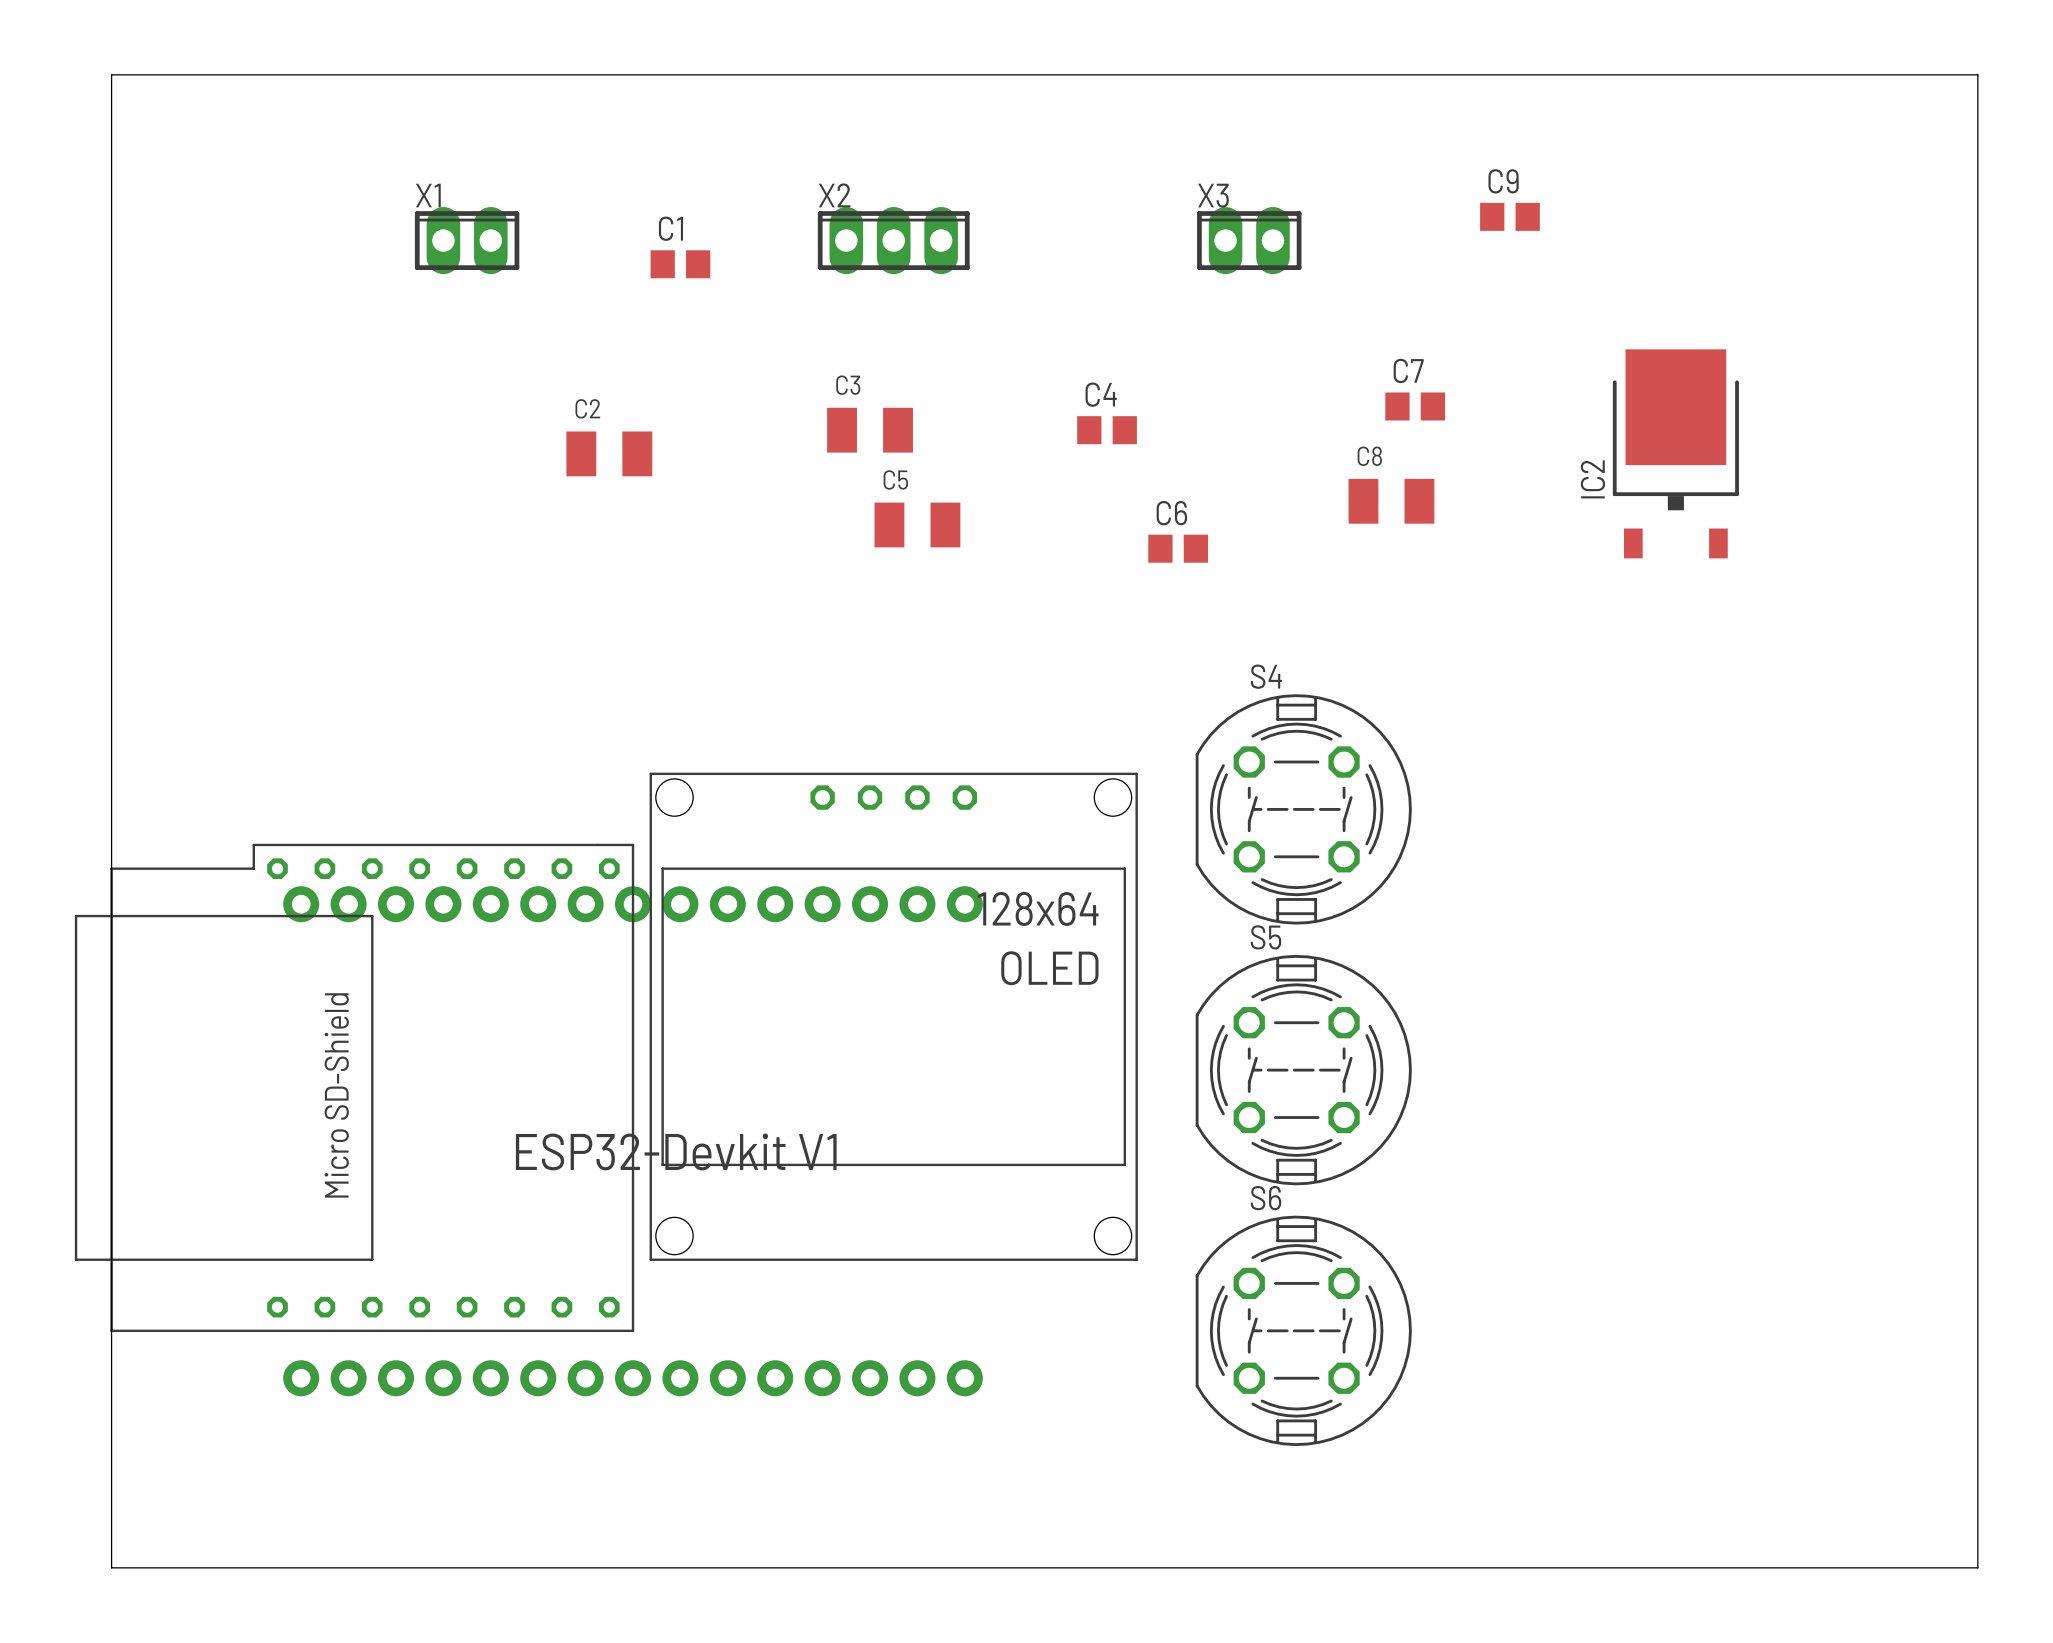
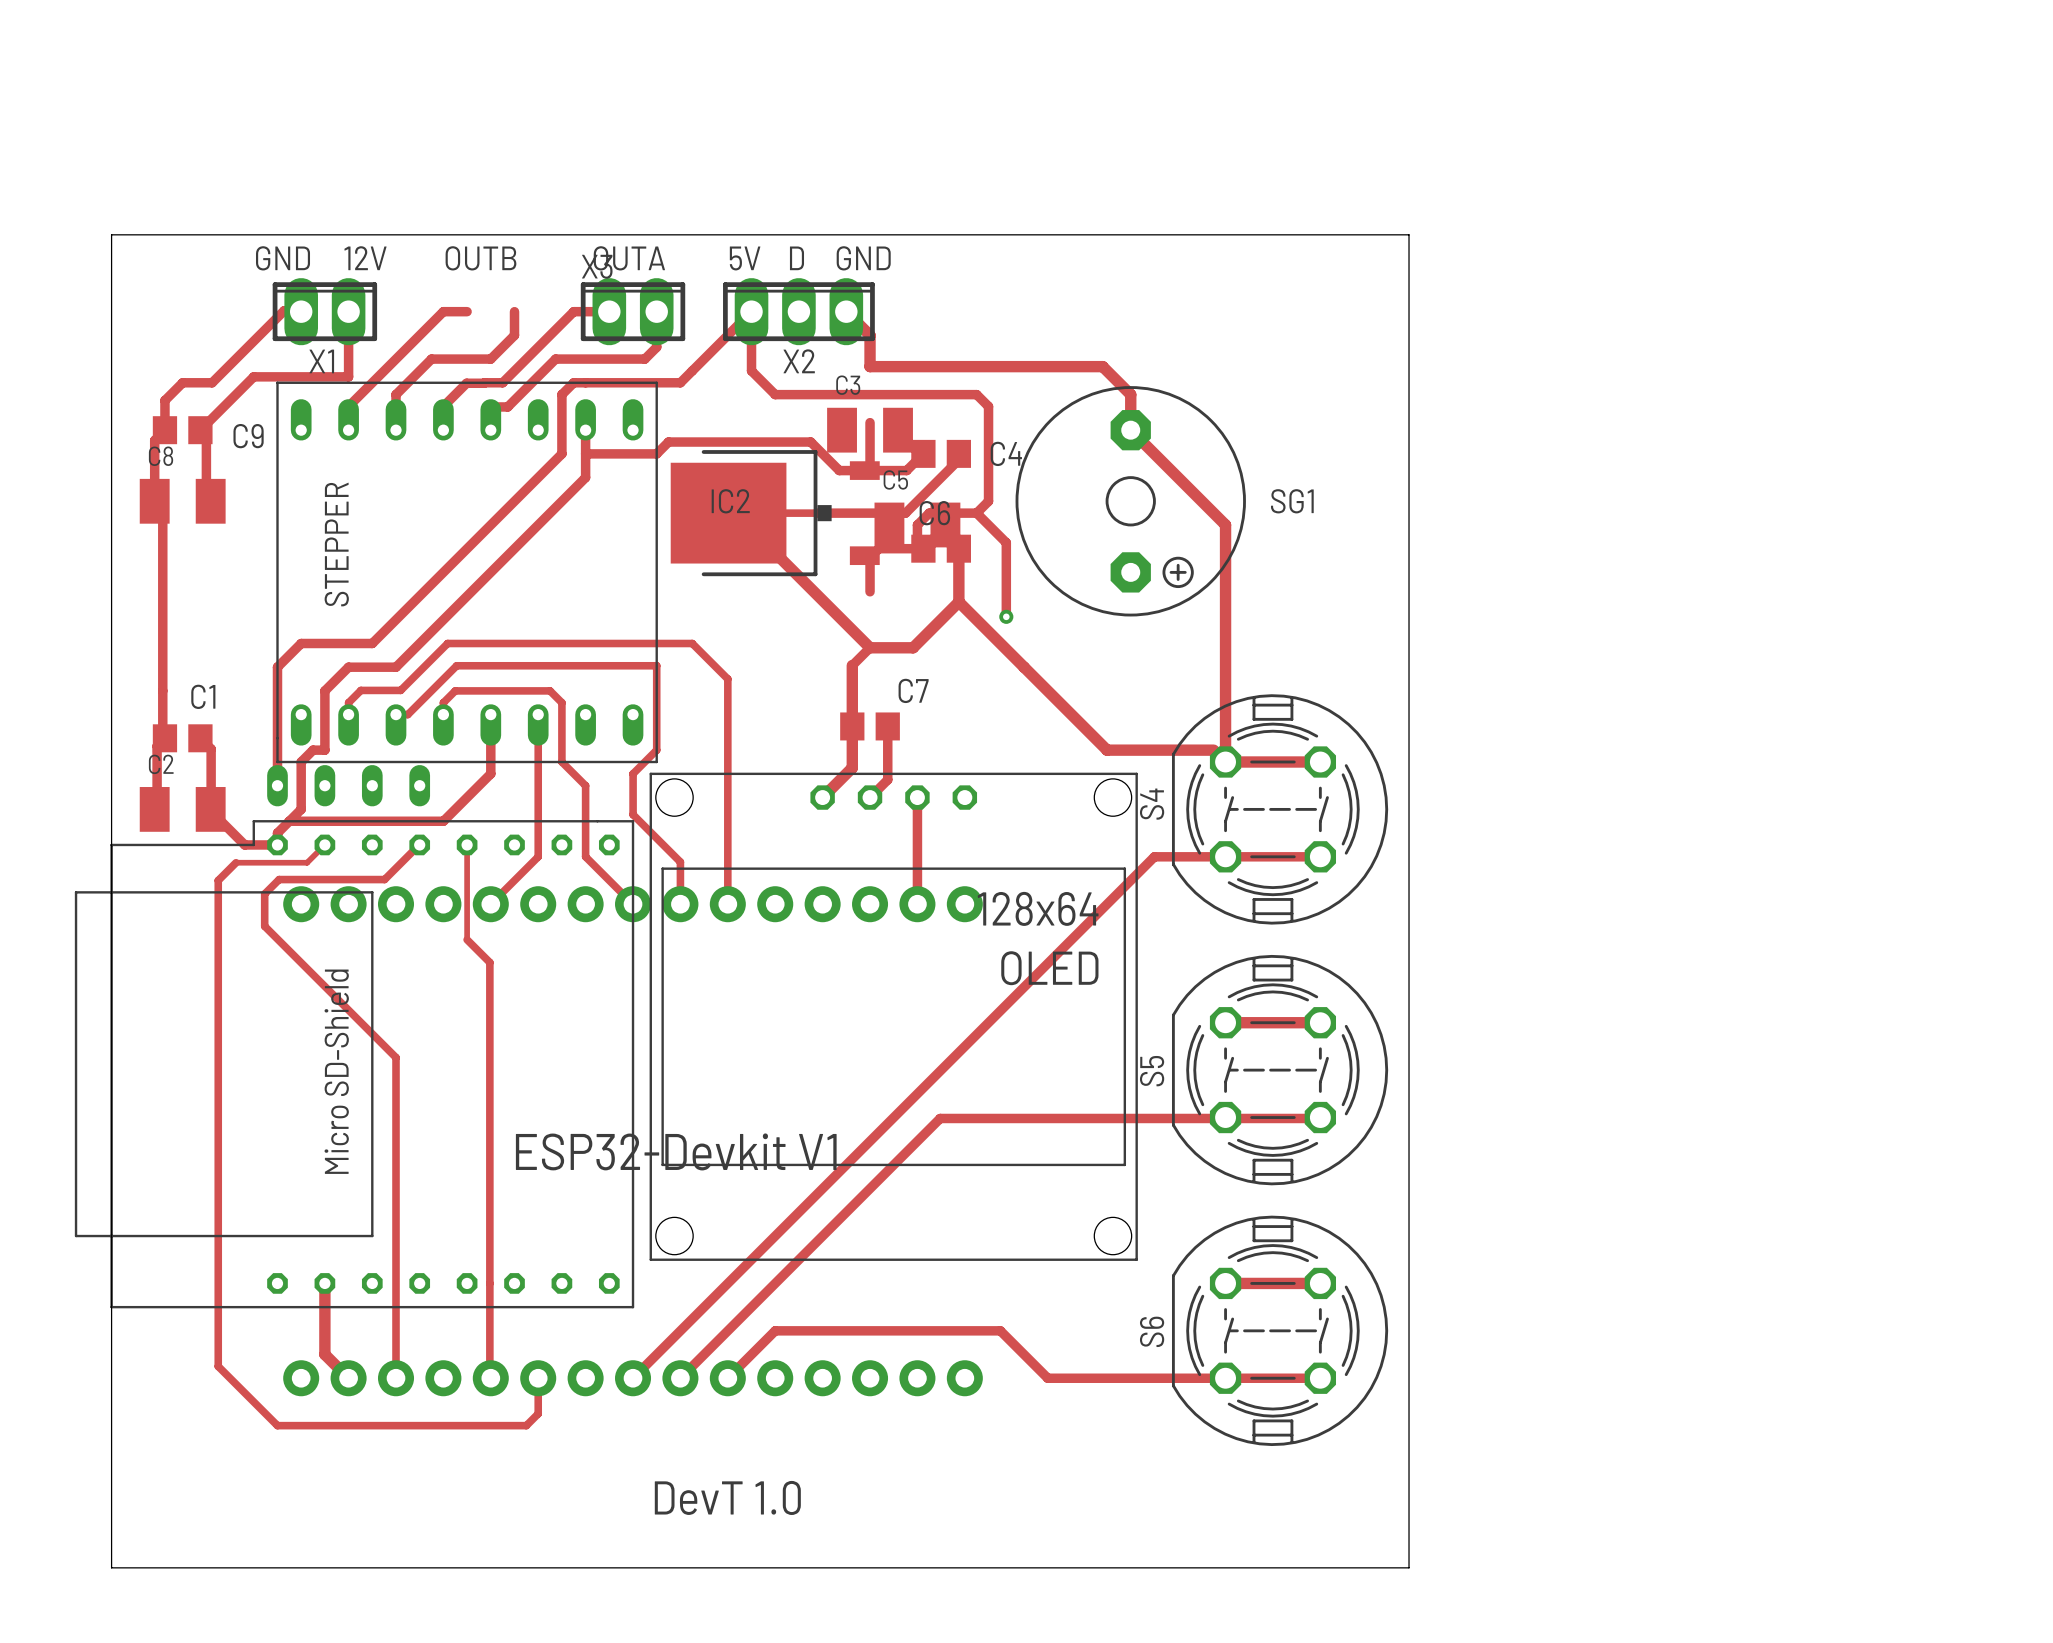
C9 name position: C9 (1503, 181) -> C9 (248, 436)
X1 name position: X1 (428, 195) -> X1 (321, 361)
X2 name position: X2 (834, 195) -> X2 (799, 361)
C9 position: (1509, 216) -> (182, 430)
C1 name position: C1 (670, 228) -> C1 (203, 696)
board edge: (111, 234) (111, 74) (1977, 74) (1977, 1567) (1409, 1567) -> (111, 234) (1409, 234) (1409, 1567)
X1 position: (467, 240) -> (324, 311)
X2 position: (893, 240) -> (798, 311)
X3 position: (1249, 240) -> (633, 311)
text: none -> GND (283, 258)
text: none -> 12V (365, 258)
text: none -> OUTB (480, 258)
text: none -> OUTA (629, 258)
text: none -> 5V (745, 258)
text: none -> D (796, 258)
text: none -> GND (863, 258)
C1 position: (680, 264) -> (182, 738)
track: none -> (301, 311) (284, 310) (212, 382) (182, 382) (164, 400) (164, 430) (154, 440) (154, 501)
track: none -> (348, 311) (348, 376) (253, 376) (200, 430)
track: none -> (467, 311) (443, 311) (348, 406) (348, 430)
track: none -> (514, 311) (514, 335) (490, 359) (431, 359) (396, 394) (396, 430)
track: none -> (609, 311) (573, 311) (502, 382) (466, 383) (443, 406) (443, 430)
track: none -> (656, 311) (656, 347) (644, 359) (555, 359) (507, 406) (490, 406) (490, 430)
track: none -> (751, 311) (680, 382) (573, 382) (561, 394) (561, 453) (372, 643) (301, 643) (277, 667) (277, 785)
track: none -> (751, 311) (751, 370) (775, 394) (976, 394) (988, 406) (988, 501) (976, 513)
track: none -> (846, 311) (870, 335) (870, 366) (1102, 366) (1130, 394) (1130, 430) (1225, 524) (1225, 762)
C7 name position: C7 (1408, 370) -> C7 (913, 690)
C4 name position: C4 (1101, 394) -> C4 (1006, 453)
C7 position: (1415, 406) -> (870, 726)
track: none -> (870, 422) (870, 465) (864, 470)
track: none -> (200, 430) (206, 436) (206, 501) (209, 501)
track: none -> (585, 430) (585, 477) (396, 667) (348, 667) (324, 690) (324, 750) (313, 750) (301, 762) (301, 809) (277, 833) (277, 844) (244, 844) (207, 807) (211, 811) (211, 749) (200, 738)
C4 position: (1107, 430) -> (941, 453)
track: none -> (585, 453) (656, 453) (668, 442) (810, 442) (839, 470) (906, 470) (923, 453)
C2 position: (609, 453) -> (182, 809)
track: none -> (958, 453) (958, 459) (905, 513) (816, 513) (733, 513) (728, 513) (735, 513) (870, 647)
IC2 rotation: 0° (1675, 453) -> 90° counterclockwise (775, 513)
IC2 position: (1675, 453) -> (775, 513)
track: none -> (154, 501) (162, 509) (162, 740) (164, 738) (157, 746) (157, 808) (154, 809)
SG1: none -> (1130, 501)
C8 position: (1391, 501) -> (182, 501)
track: none -> (976, 513) (1006, 542) (1006, 616)
track: none -> (976, 513) (929, 513) (917, 524) (917, 542) (923, 548) (878, 548) (870, 557) (870, 591) (870, 560) (864, 555)
C6 position: (1178, 548) -> (941, 548)
STEPPER: none -> (467, 572)
via: none -> (1006, 616)
track: none -> (870, 647) (852, 665) (852, 767) (822, 797)
track: none -> (870, 647) (913, 647) (958, 602) (958, 548) (958, 601) (1107, 750) (1213, 750) (1225, 762)
S4 name rotation: 0° (1266, 676) -> 90° counterclockwise (1152, 804)
S4 name position: S4 (1266, 676) -> S4 (1152, 804)
track: none -> (348, 714) (348, 702) (360, 690) (400, 690) (447, 643) (692, 643) (727, 679) (727, 904)
track: none -> (396, 714) (407, 714) (456, 665) (656, 665) (656, 750) (633, 773)
track: none -> (490, 714) (490, 773) (443, 821) (289, 821)
track: none -> (443, 726) (443, 702) (455, 690) (550, 690) (561, 702) (561, 762) (585, 785) (585, 856) (633, 904)
track: none -> (887, 726) (887, 779) (870, 797)
track: none -> (1225, 762) (1320, 762)
track: none -> (633, 773) (633, 814) (680, 862) (680, 904)
part: none -> (348, 785)
track: none -> (917, 797) (917, 904)
S4 position: (1303, 809) -> (1280, 809)
track: none -> (324, 844) (307, 862) (236, 862) (218, 880) (218, 1366) (277, 1425) (526, 1425) (538, 1413) (538, 1378)
track: none -> (419, 844) (384, 879) (279, 879) (264, 894) (264, 926) (396, 1057) (396, 1378)
track: none -> (467, 844) (467, 939) (489, 962) (490, 1378)
track: none -> (538, 856) (538, 714) (538, 856)
track: none -> (538, 856) (490, 904)
track: none -> (1320, 856) (1154, 856) (633, 1378)
S5 name rotation: 0° (1266, 937) -> 90° counterclockwise (1152, 1071)
S5 name position: S5 (1266, 937) -> S5 (1152, 1071)
track: none -> (1225, 1022) (1320, 1022)
S5 position: (1303, 1070) -> (1280, 1070)
part position: (354, 1087) -> (354, 1064)
track: none -> (1320, 1117) (940, 1118) (680, 1378)
S6 name rotation: 0° (1266, 1198) -> 90° counterclockwise (1152, 1331)
S6 name position: S6 (1266, 1198) -> S6 (1152, 1331)
track: none -> (324, 1283) (324, 1354) (348, 1378)
track: none -> (1225, 1283) (1320, 1283)
S6 position: (1303, 1330) -> (1280, 1330)
track: none -> (727, 1378) (775, 1330) (1000, 1330) (1047, 1378) (1320, 1378)
text: none -> DevT 1.0 (727, 1497)

